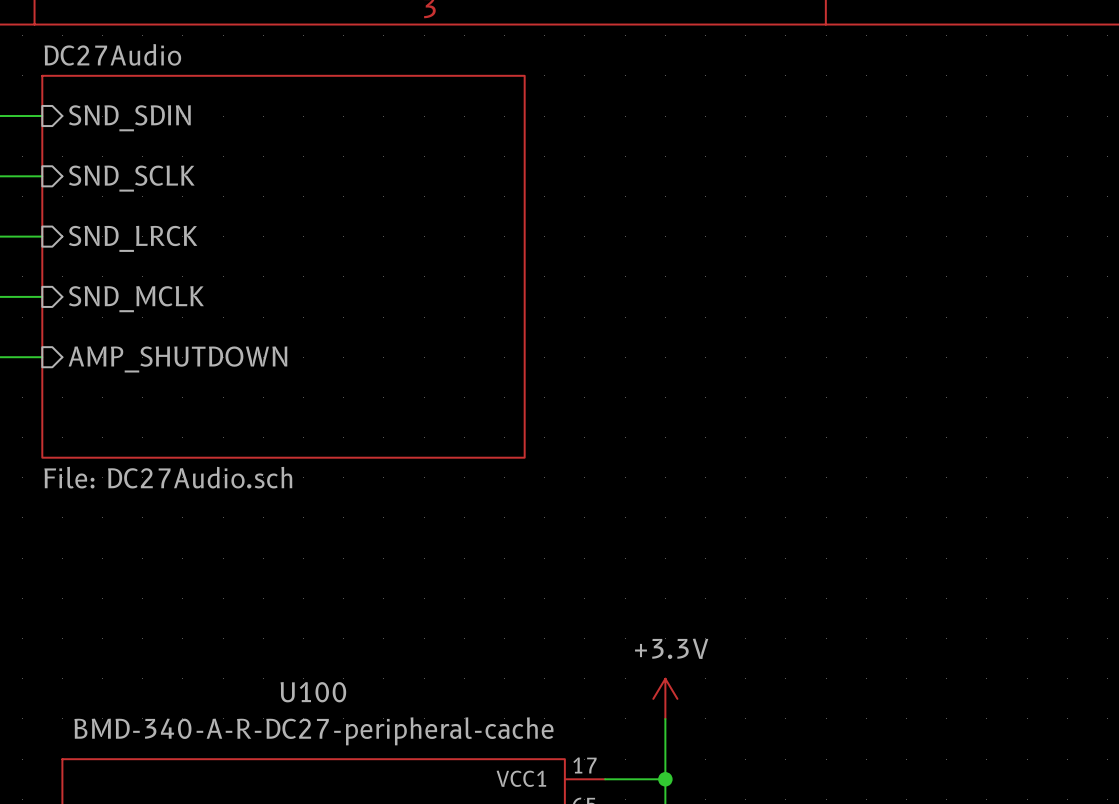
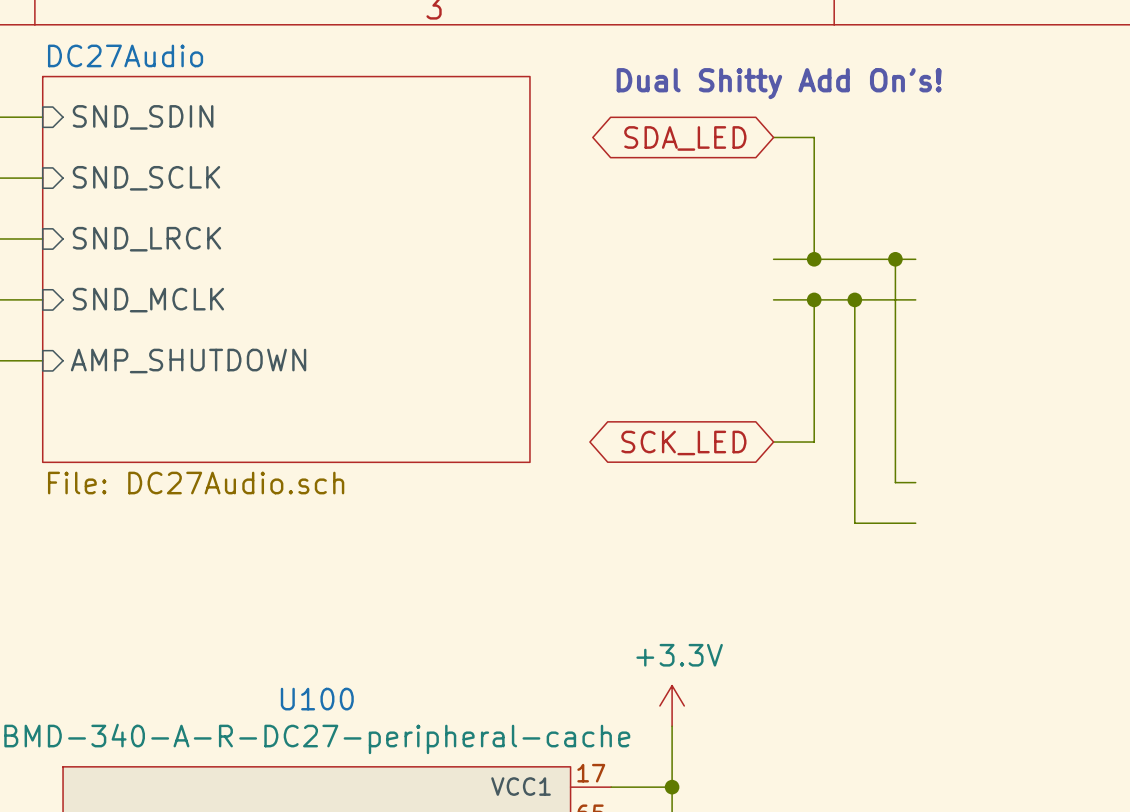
text: none -> Dual Shitty Add On’s! (779, 83)
wire: none -> (773, 137) (814, 137) (814, 259)
global label: none -> SDA_LED (685, 138)
wire: none -> (773, 259) (915, 259)
junction: none -> (814, 259)
wire: none -> (895, 259) (895, 482) (915, 482)
junction: none -> (895, 259)
wire: none -> (773, 299) (915, 299)
wire: none -> (814, 299) (814, 442) (773, 442)
junction: none -> (814, 299)
wire: none -> (854, 299) (854, 523) (915, 523)
junction: none -> (854, 299)
global label: none -> SCK_LED (683, 442)

